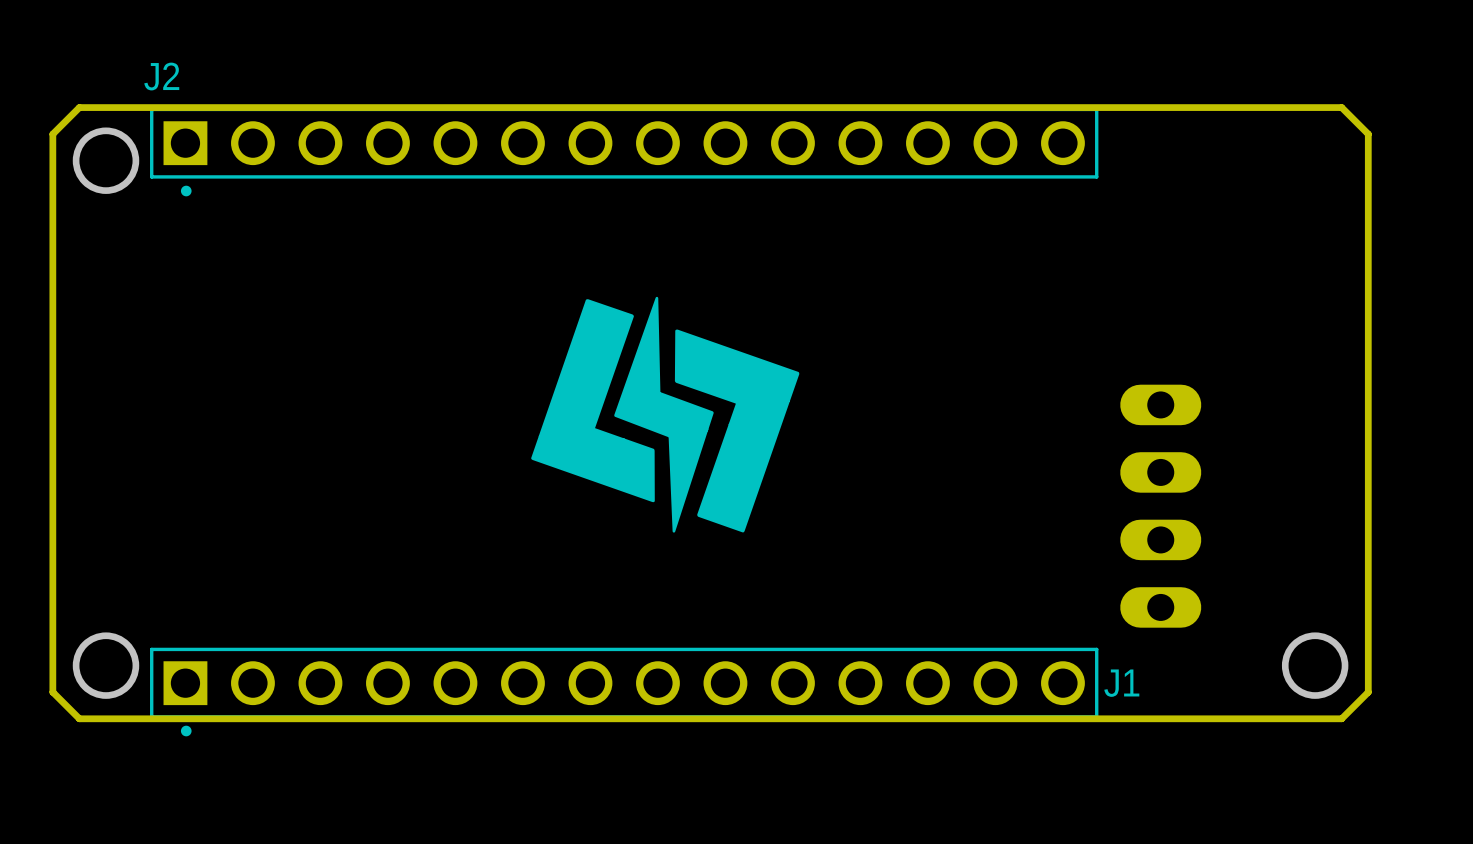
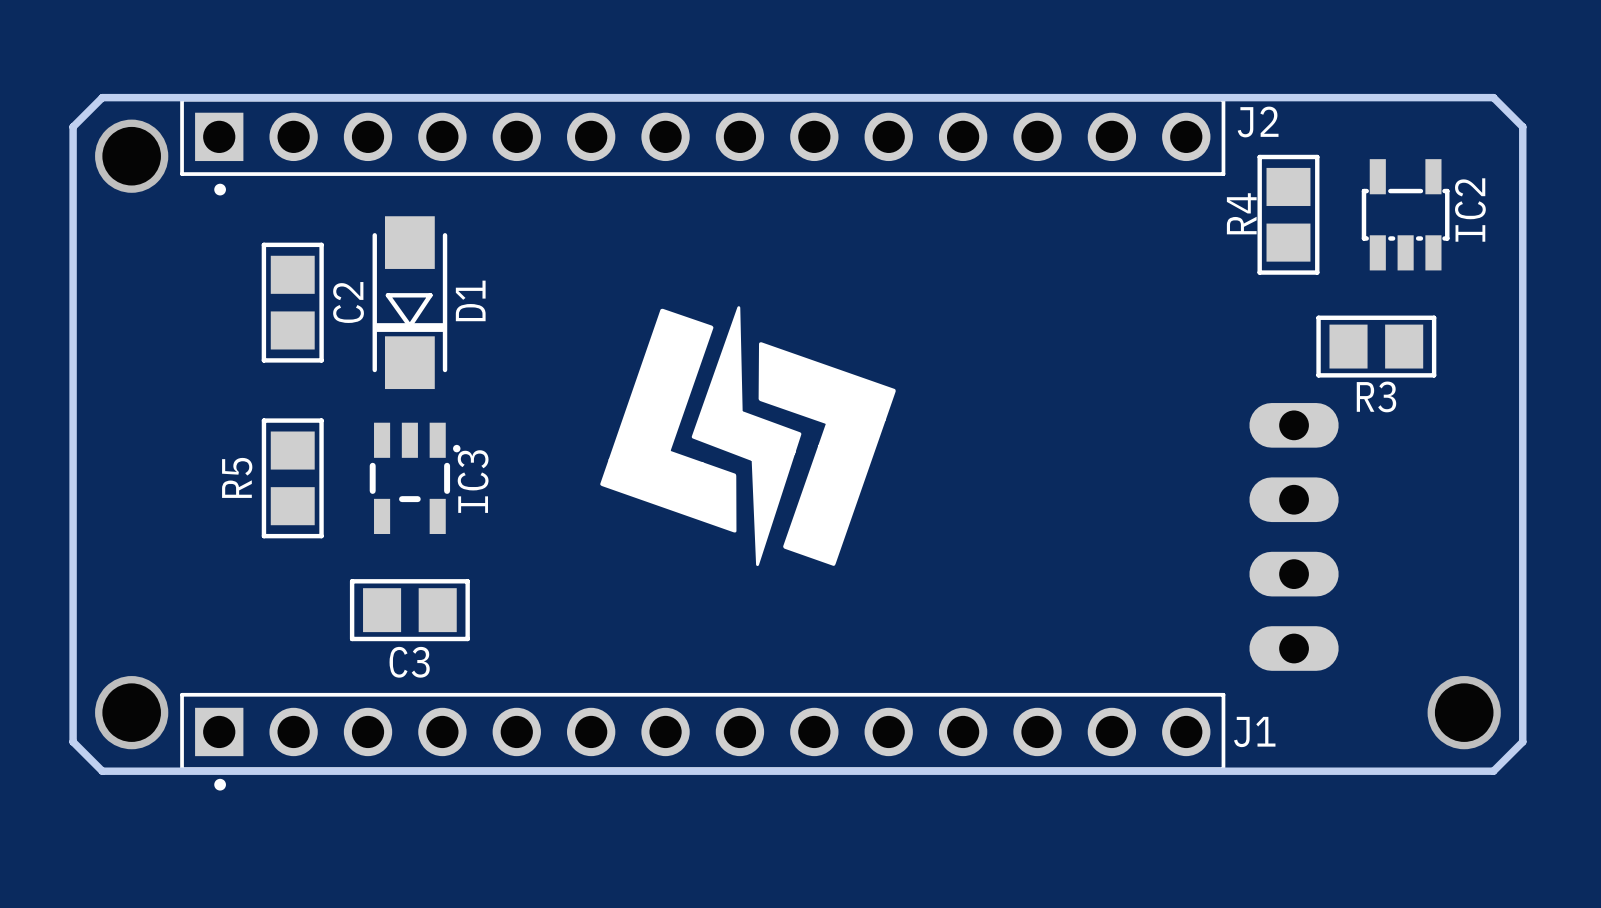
J2 name position: J2 (161, 76) -> J2 (1258, 122)
R4: none -> (1288, 214)
IC2: none -> (1405, 214)
C2: none -> (292, 302)
D1: none -> (409, 302)
R3: none -> (1376, 346)
R5: none -> (292, 478)
IC3: none -> (415, 478)
C3: none -> (409, 610)

